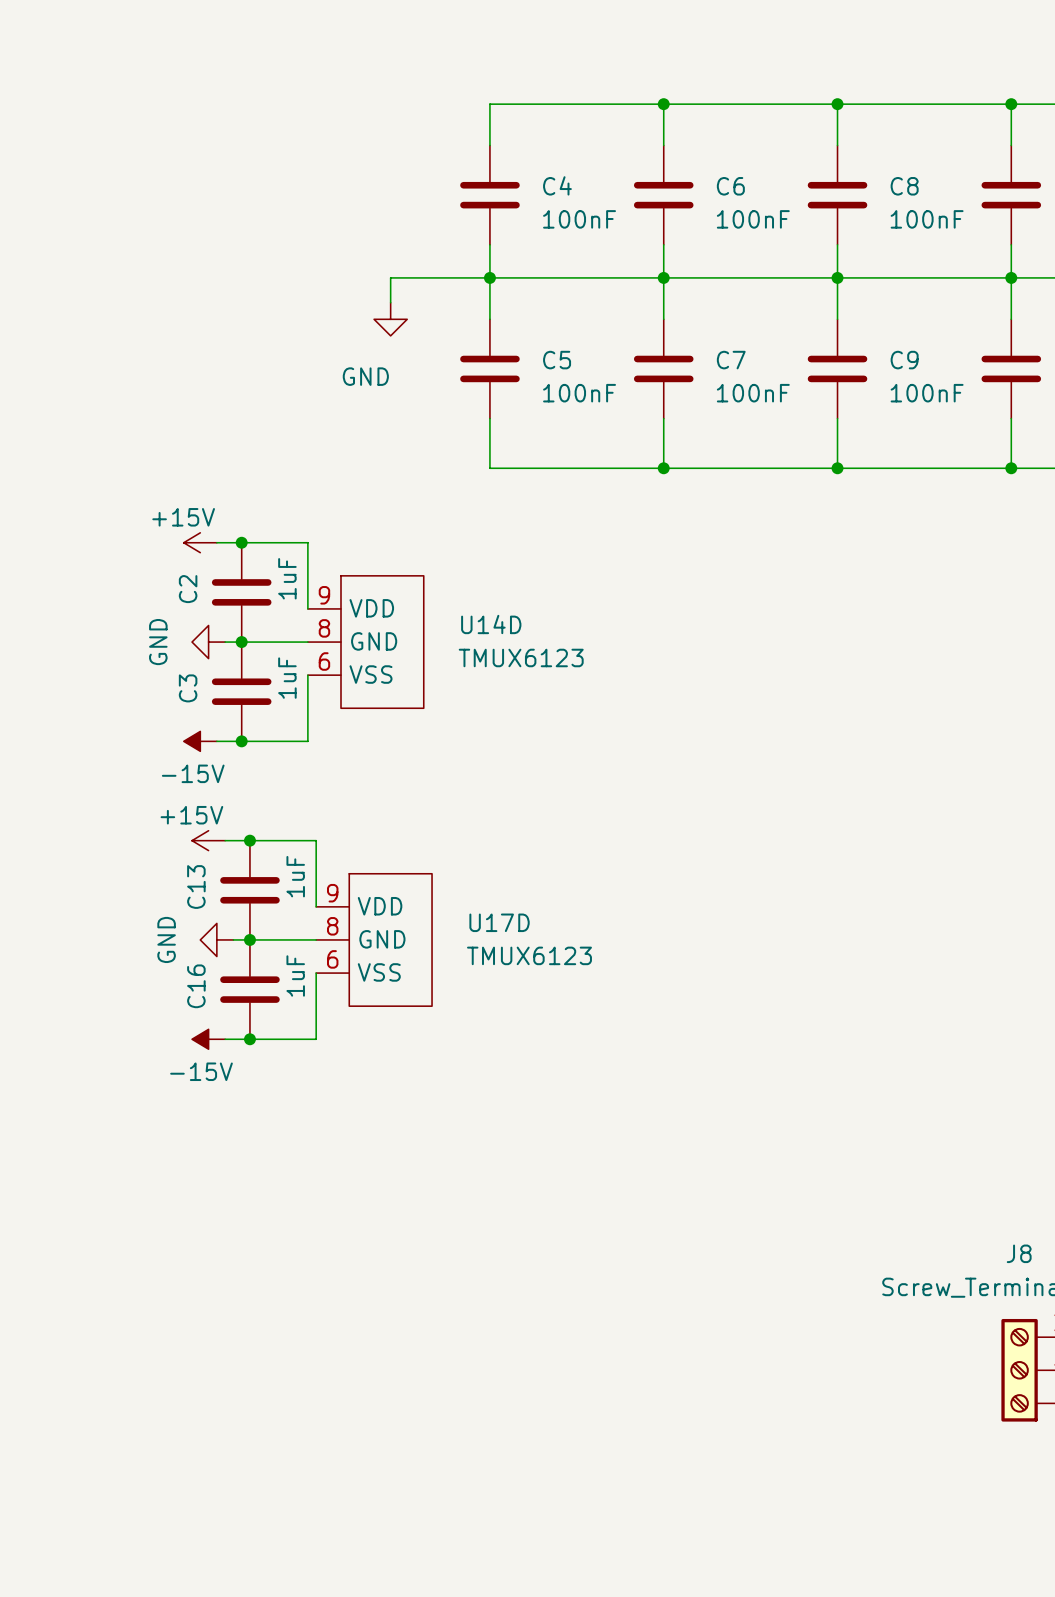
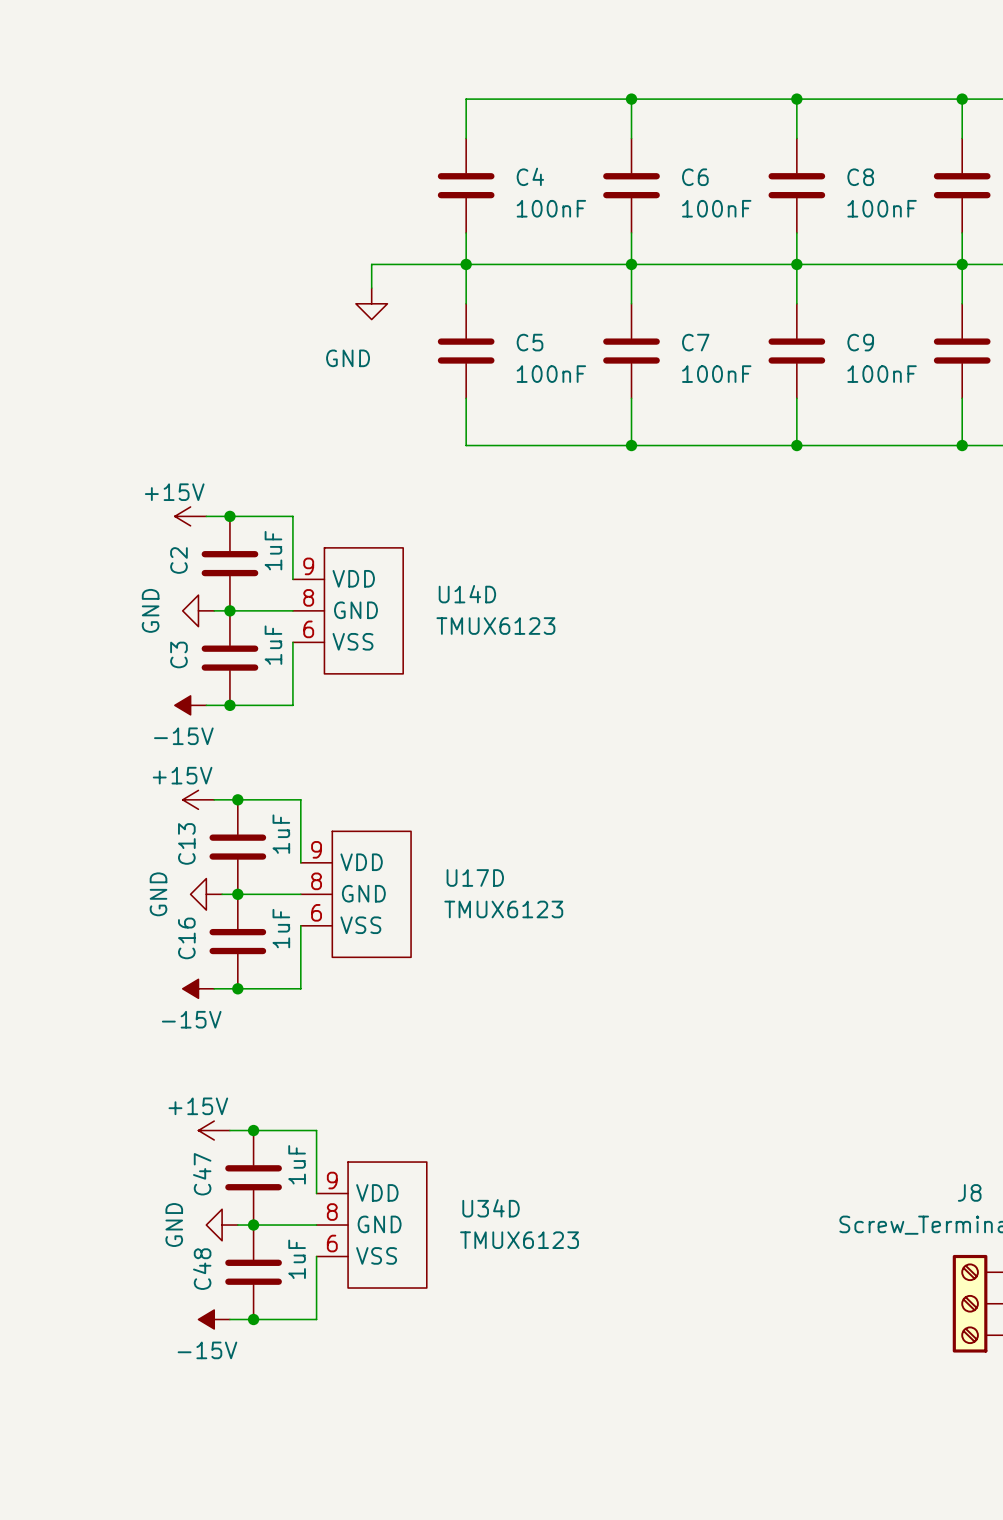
power symbol: none -> +15V (214, 1130)
wire: none -> (229, 1130) (316, 1130) (316, 1193)
junction: none -> (253, 1130)
C47: none -> 1uF (253, 1177)
power symbol: none -> GND (222, 1225)
wire: none -> (237, 1225) (316, 1225)
junction: none -> (253, 1225)
U34D: none -> TMUX6123 (371, 1225)
wire: none -> (316, 1256) (316, 1319) (229, 1319)
C48: none -> 1uF (253, 1272)
power symbol: none -> -15V (214, 1319)
junction: none -> (253, 1319)

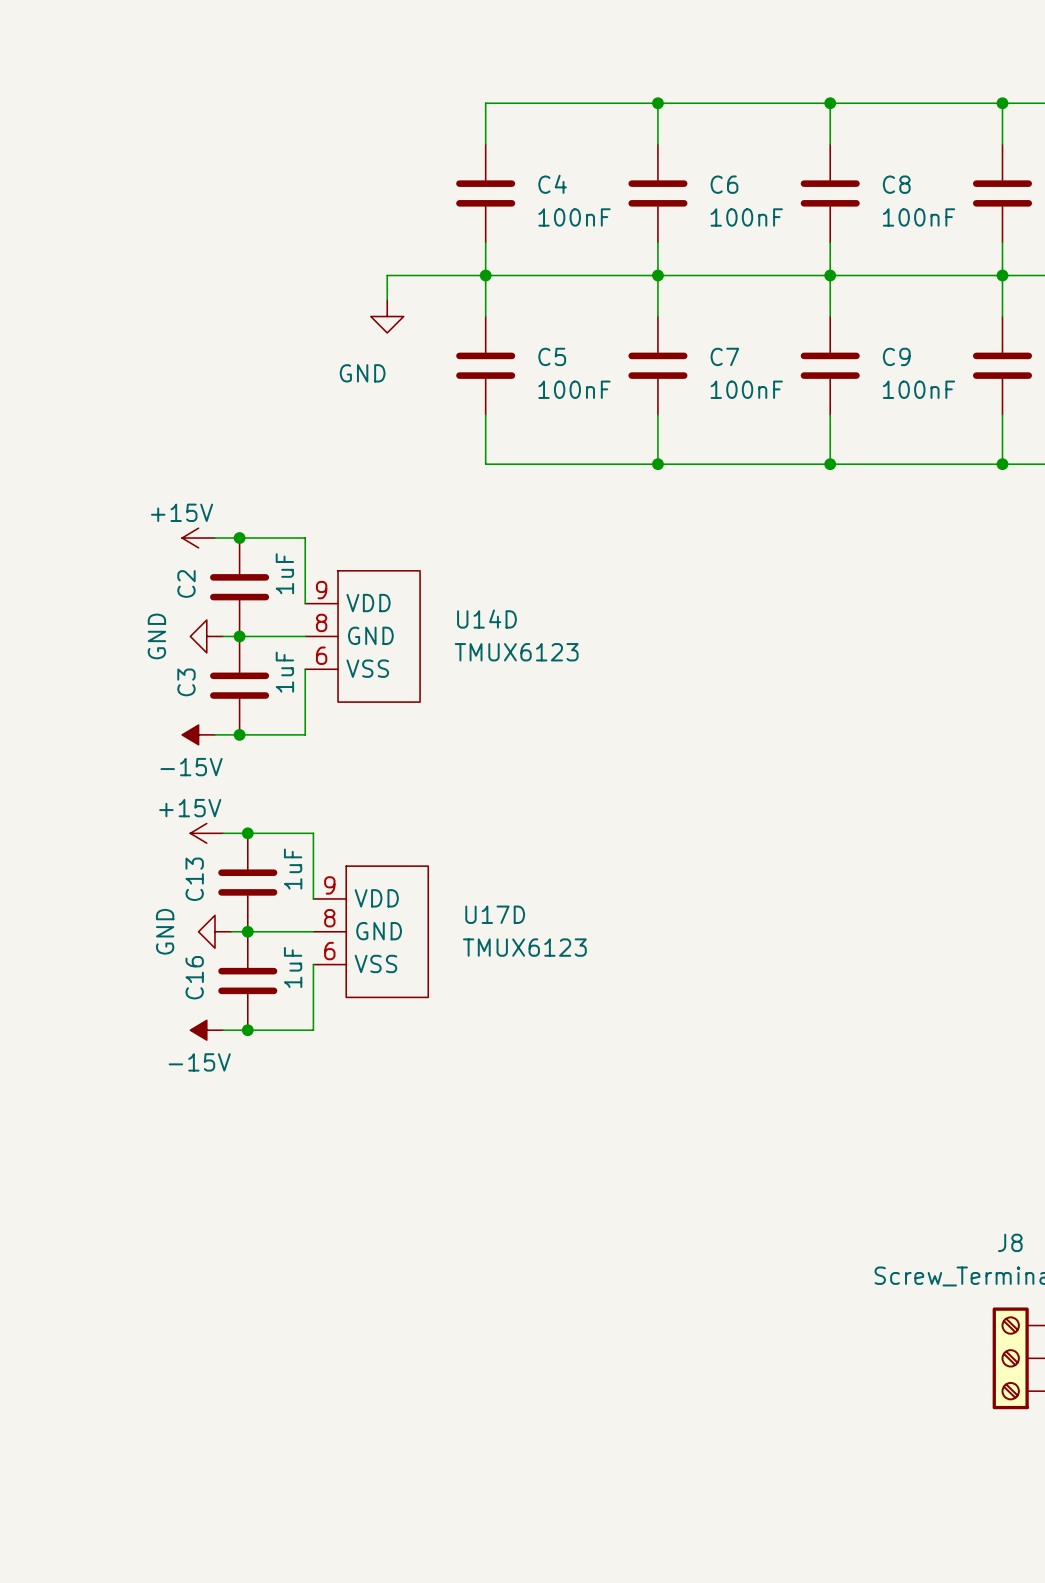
power symbol: +15V (214, 1130) -> none
wire: (229, 1130) (316, 1130) (316, 1193) -> none
junction: (253, 1130) -> none
C47: 1uF (253, 1177) -> none
power symbol: GND (222, 1225) -> none
wire: (237, 1225) (316, 1225) -> none
junction: (253, 1225) -> none
U34D: TMUX6123 (371, 1225) -> none
wire: (316, 1256) (316, 1319) (229, 1319) -> none
C48: 1uF (253, 1272) -> none
power symbol: -15V (214, 1319) -> none
junction: (253, 1319) -> none

